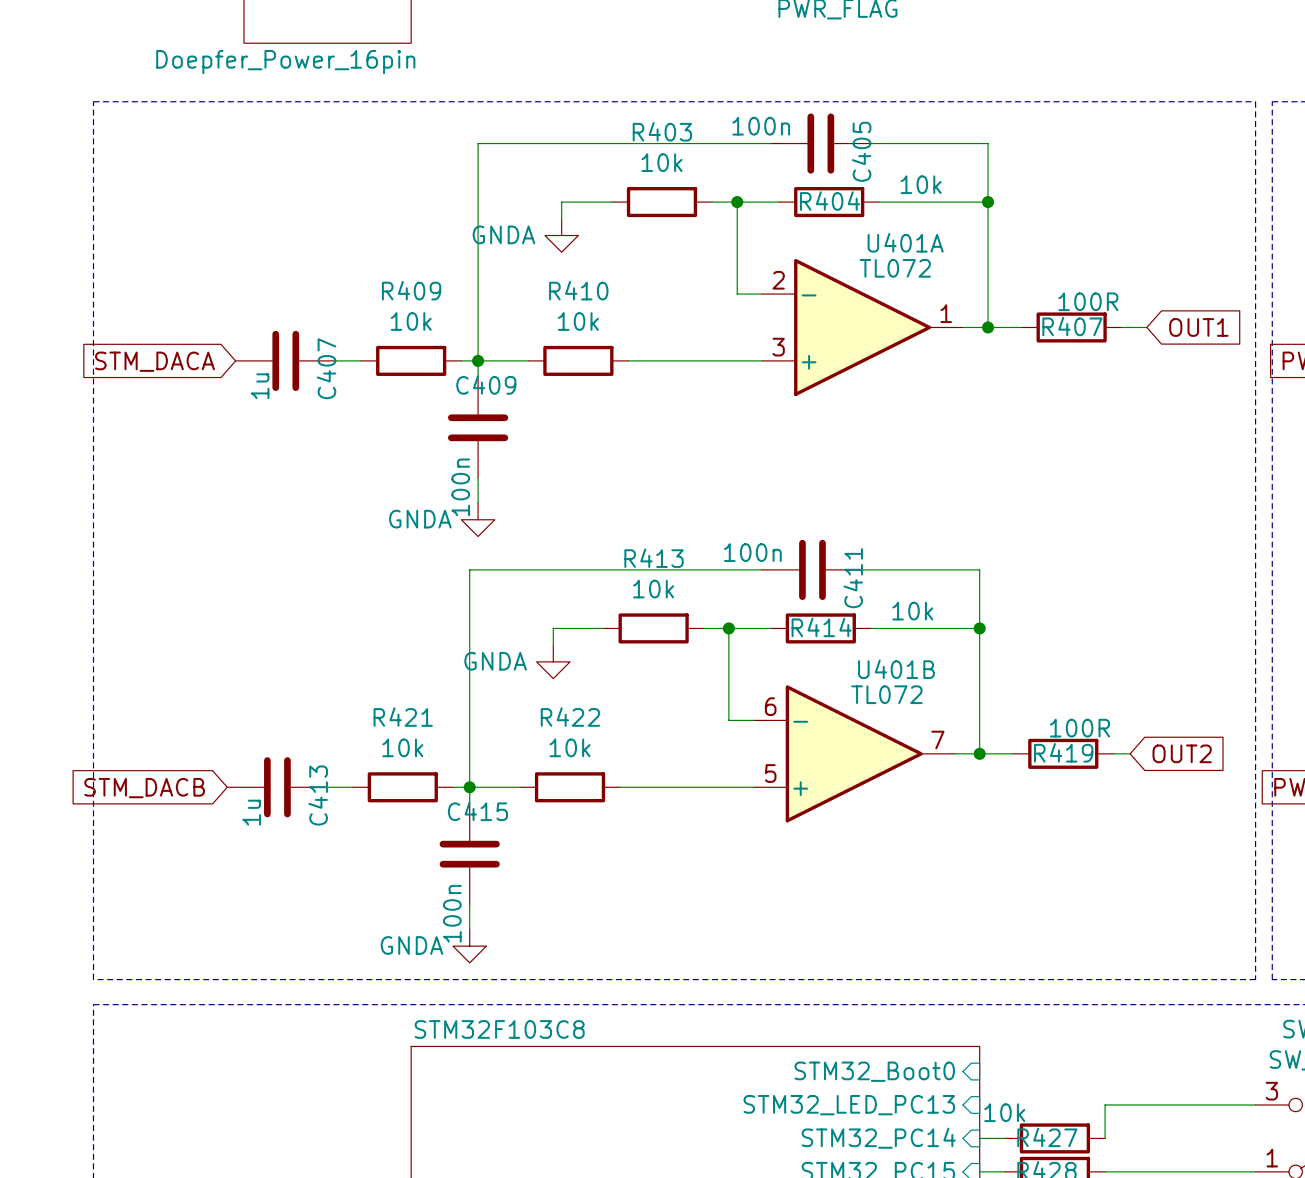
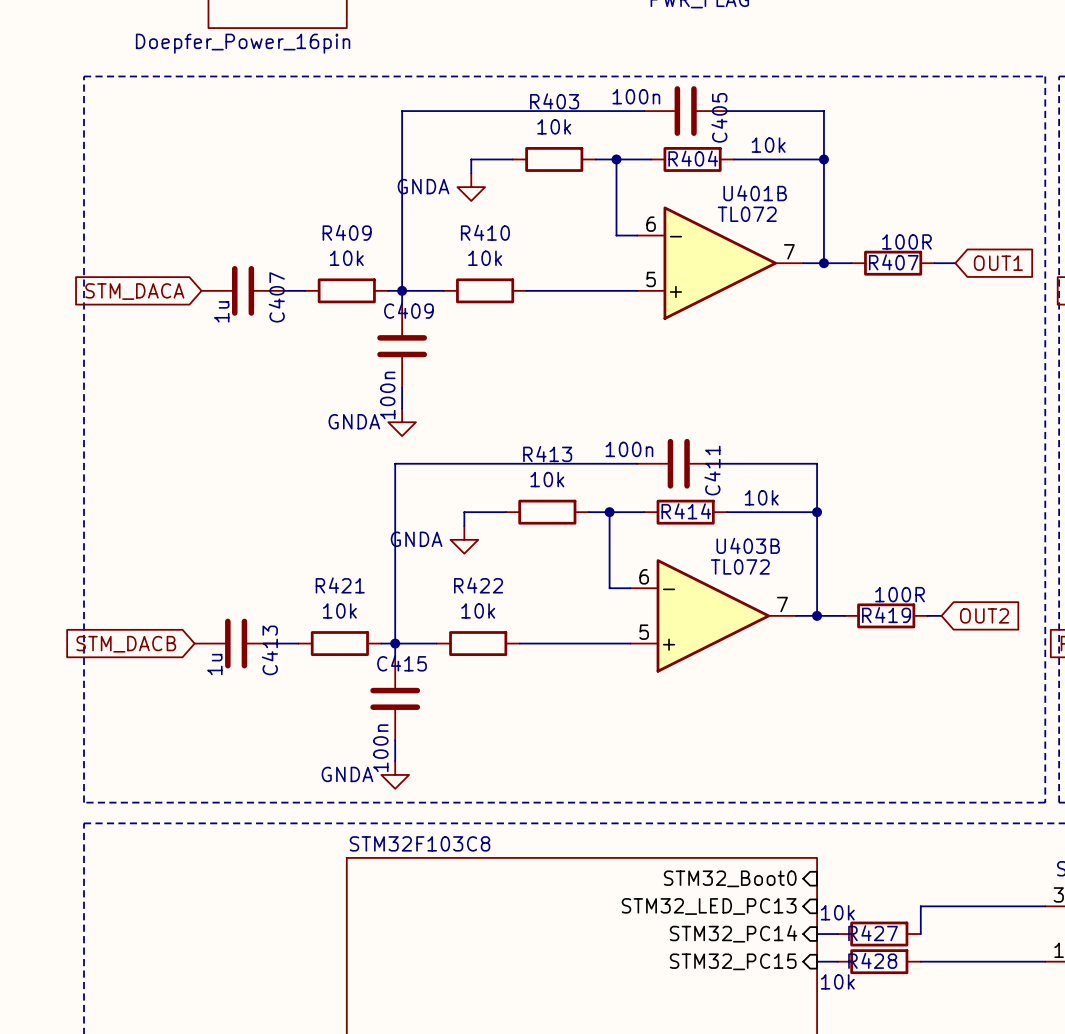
U401A name: U401A (905, 242) -> U401B (755, 193)
U401A pin number: 2 (778, 280) -> 6 (651, 224)
U401A pin number: 1 (946, 313) -> 7 (789, 251)
U401A pin number: 3 (778, 347) -> 5 (651, 279)
U401B name: U401B (896, 669) -> U403B (748, 545)

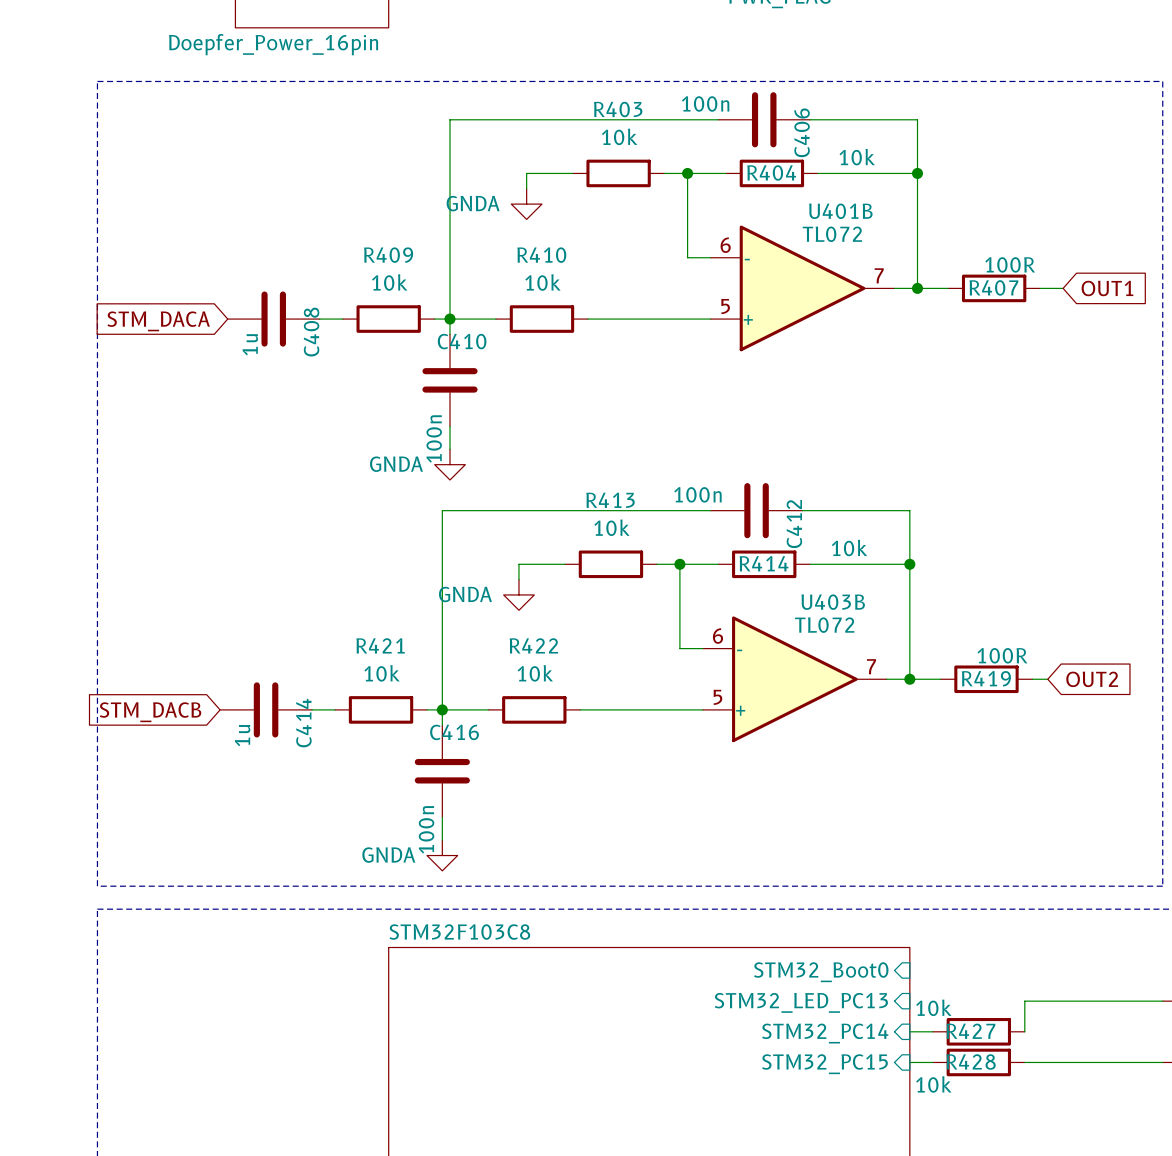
C405 name: C405 (719, 117) -> C406 (802, 132)
C407 name: C407 (276, 297) -> C408 (311, 332)
C409 name: C409 (408, 310) -> C410 (462, 341)
C411 name: C411 (712, 470) -> C412 (794, 524)
C413 name: C413 (269, 650) -> C414 (303, 723)
C415 name: C415 (402, 663) -> C416 (454, 732)

